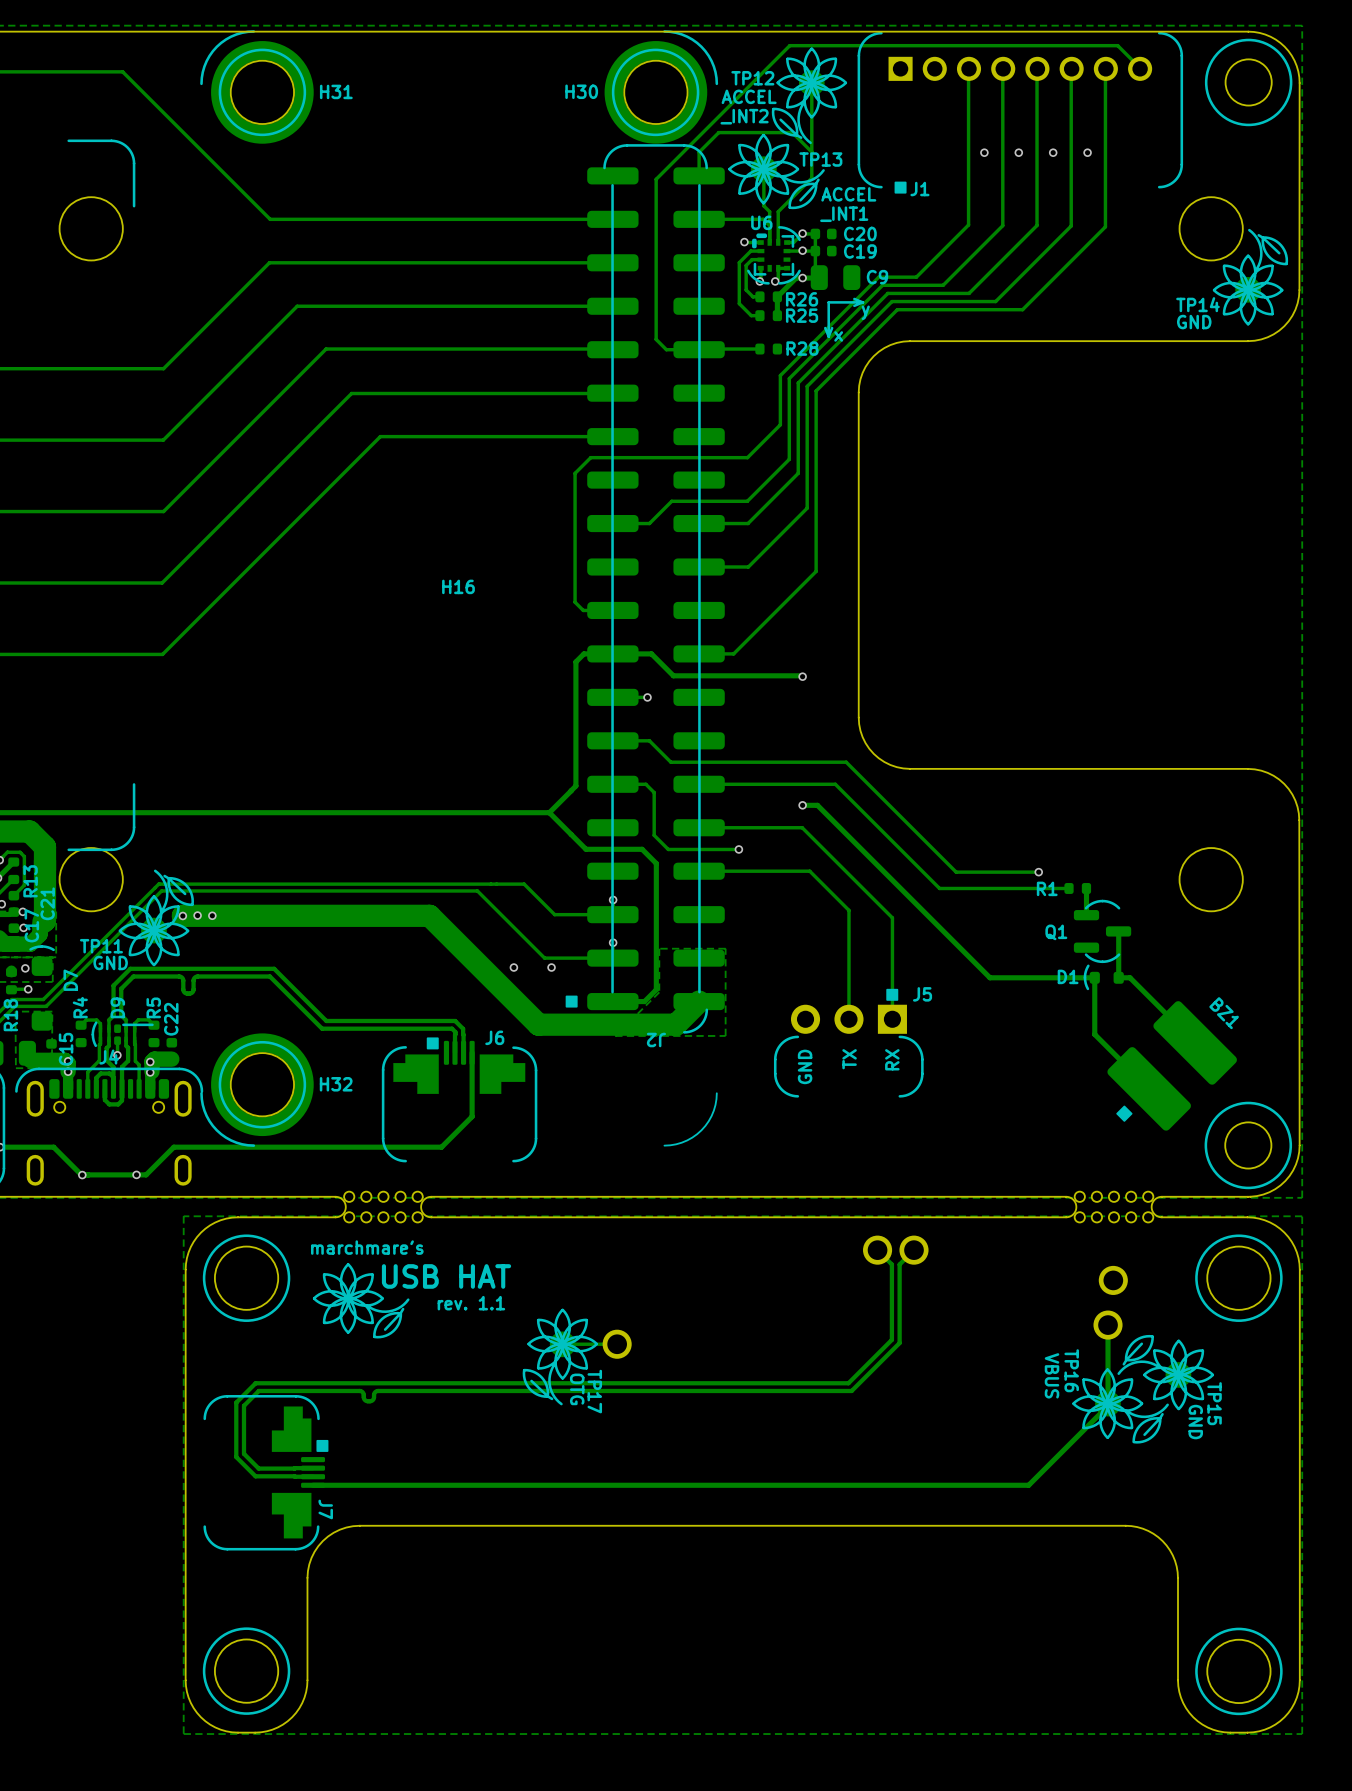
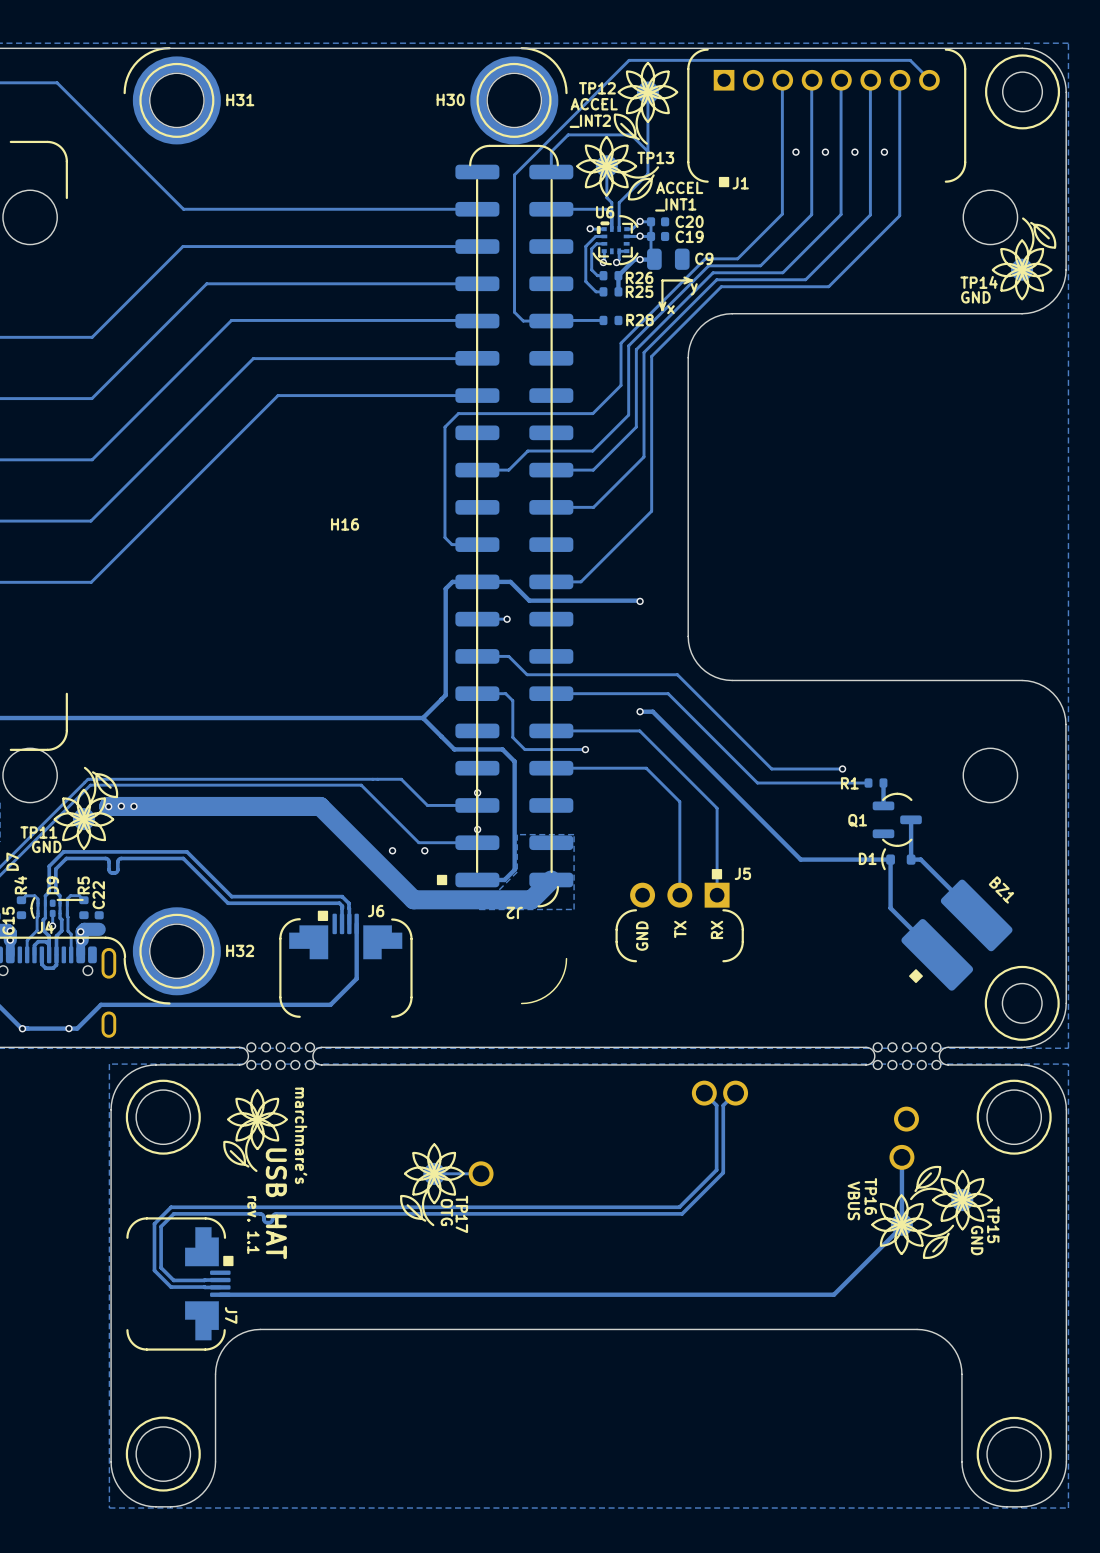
text rotation: 0° (367, 1247) -> 90° clockwise (301, 1135)
drawing shape: [312, 1263, 410, 1339] -> [223, 1089, 288, 1173]
text rotation: 0° (446, 1276) -> 90° clockwise (276, 1203)
text rotation: 0° (471, 1303) -> 90° clockwise (253, 1225)
text position: rev. 1.1 (471, 1303) -> rev. 1.1 (253, 1225)

